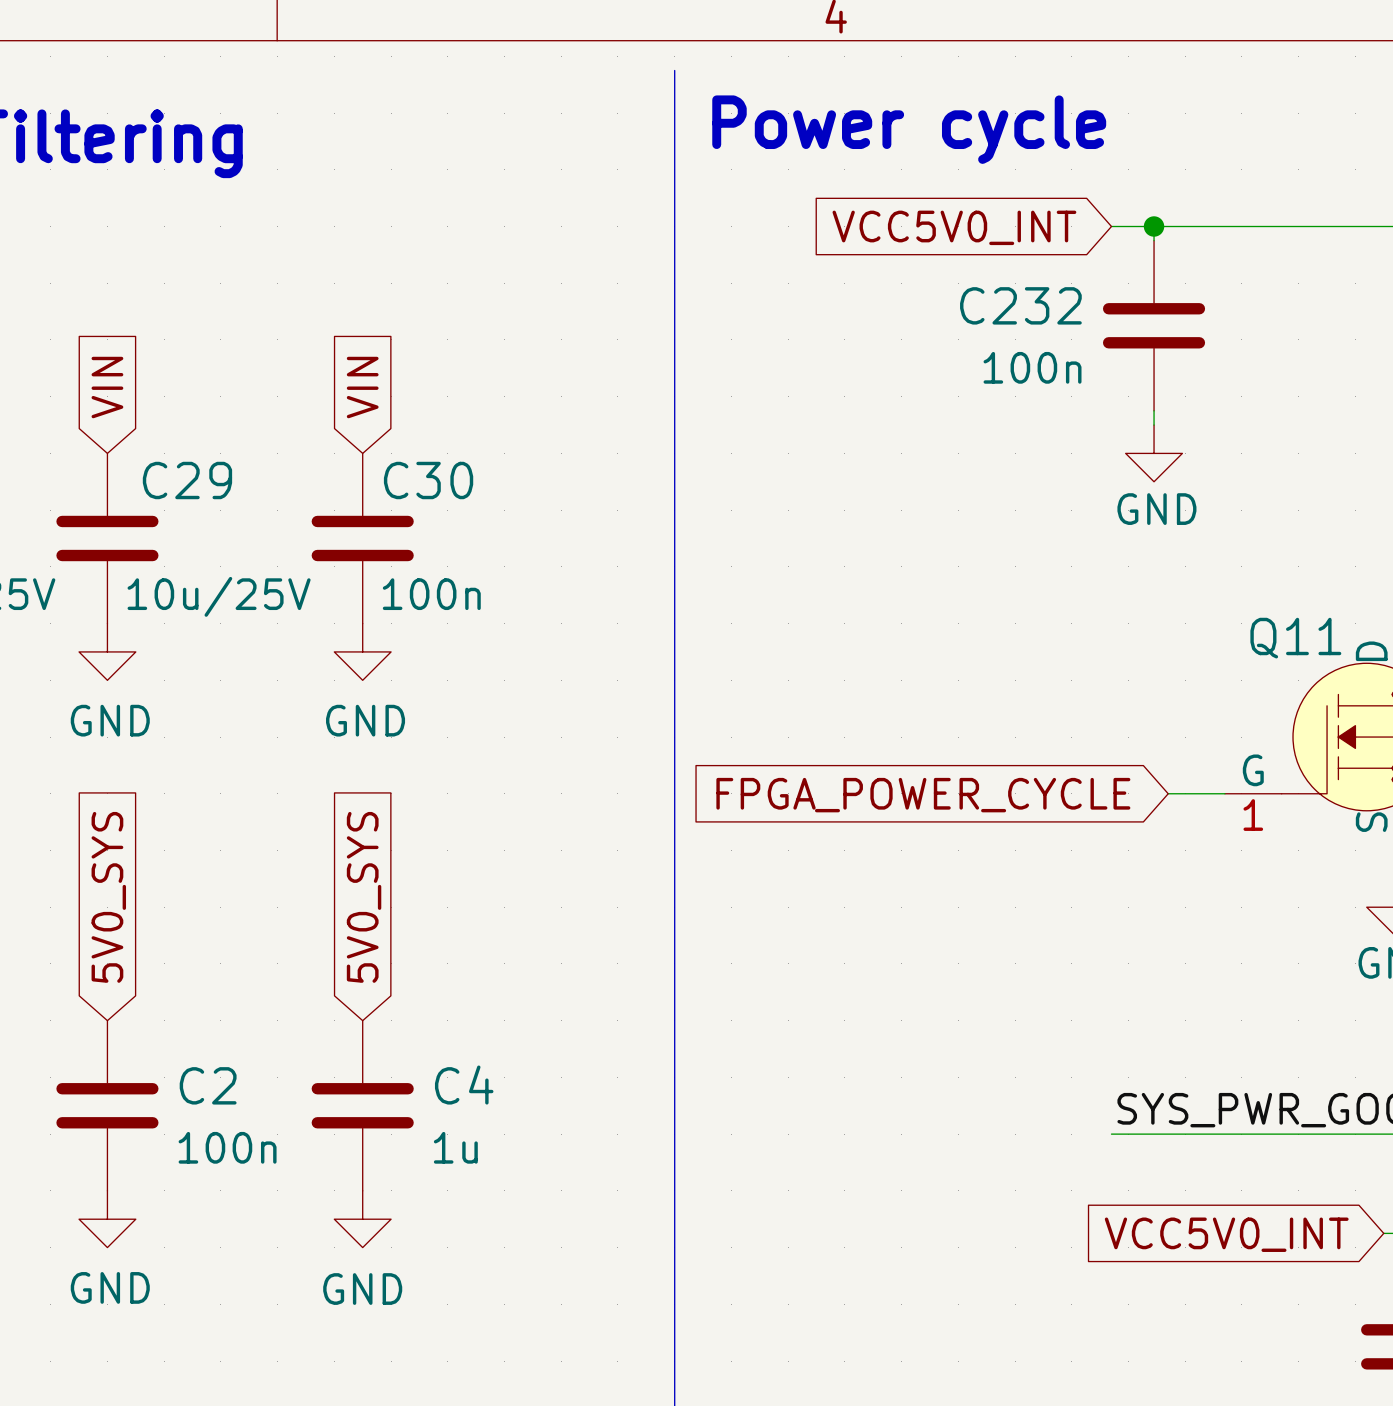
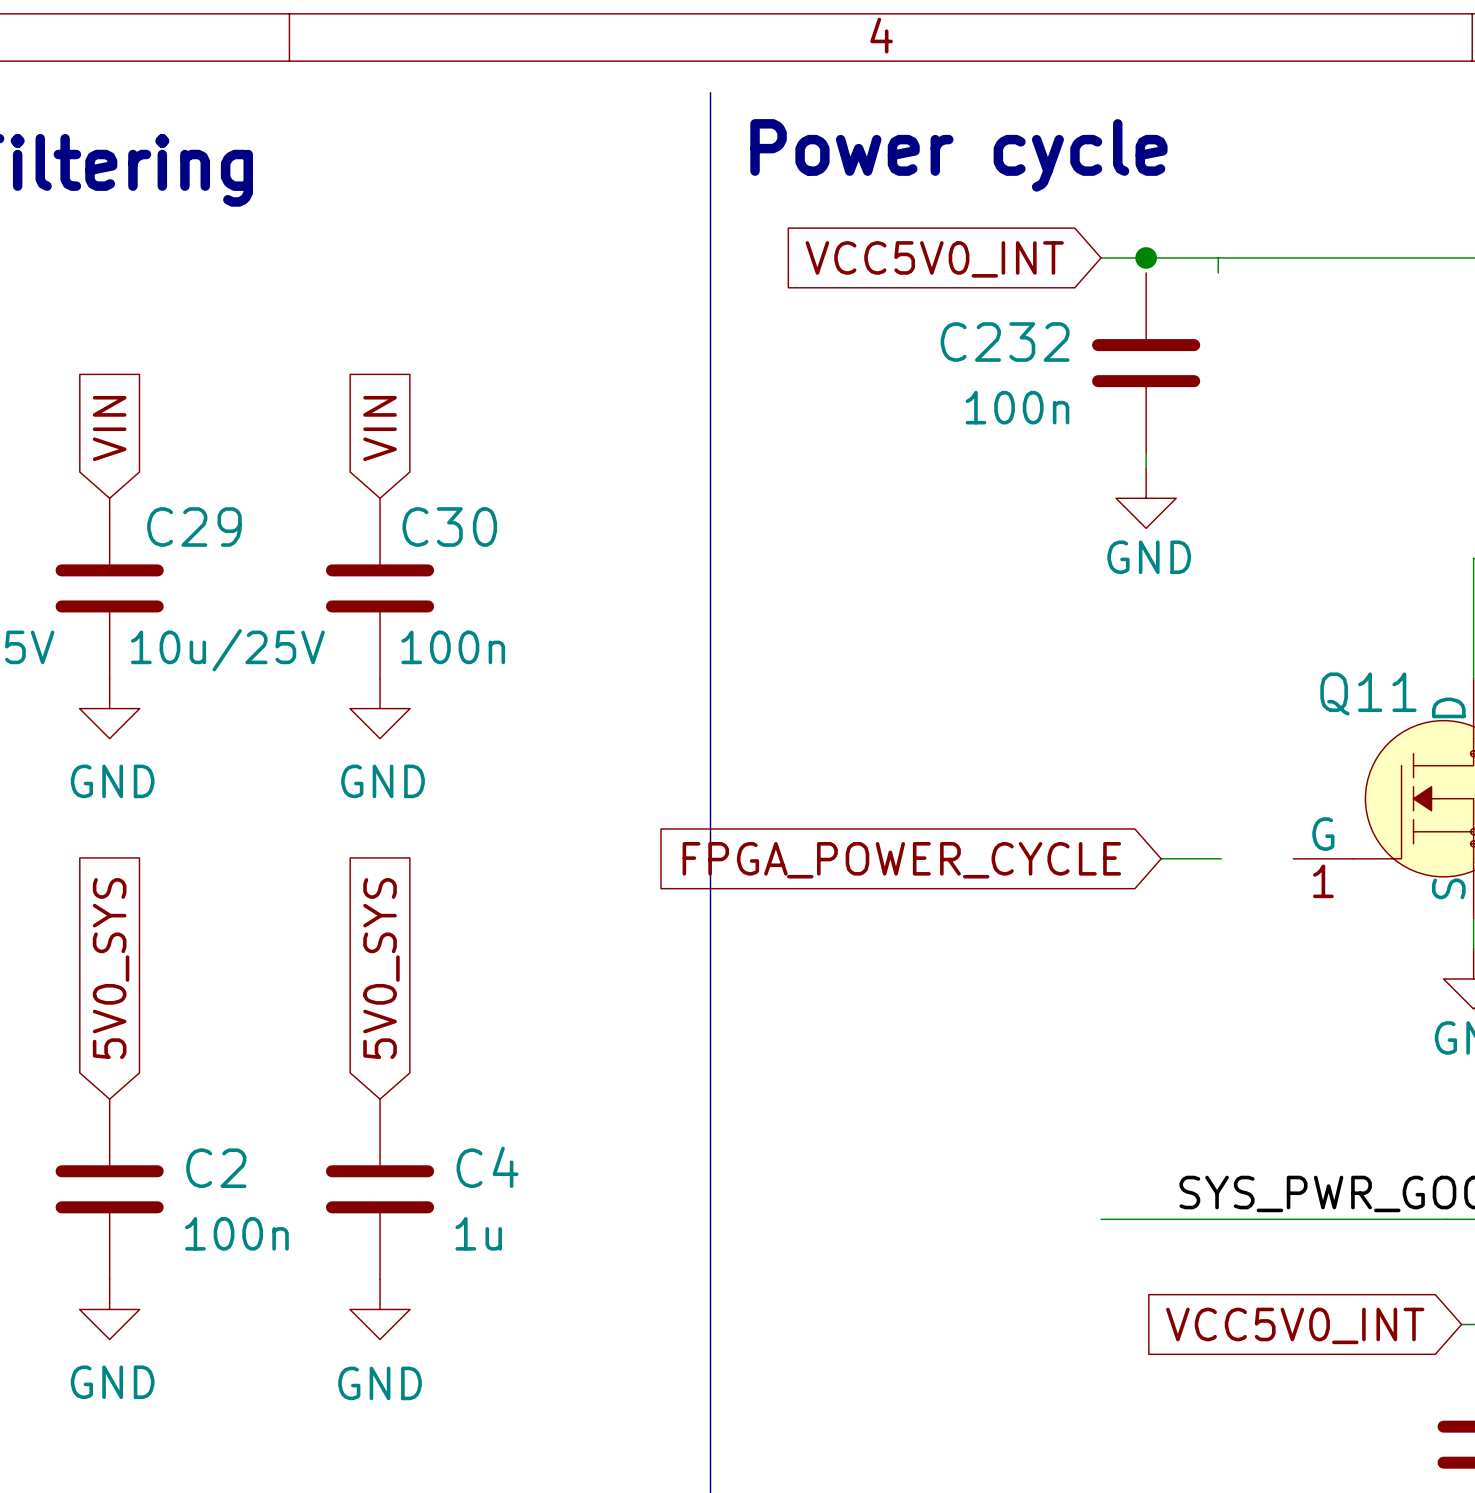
wire: none -> (1101, 257) (1173, 257)
junction position: (1154, 226) -> (1146, 257)
global label position: VCC5V0_INT (954, 227) -> VCC5V0_INT (934, 259)
C232 position: (1154, 325) -> (1146, 363)
wire: (1154, 410) (1154, 425) -> (1146, 453) (1146, 468)
power symbol position: GND (1154, 453) -> GND (1146, 498)
wire: (1168, 793) (1224, 793) -> (1161, 858) (1221, 858)
global label position: FPGA_POWER_CYCLE (923, 795) -> FPGA_POWER_CYCLE (901, 860)
wire: none -> (1101, 1219) (1173, 1219)

